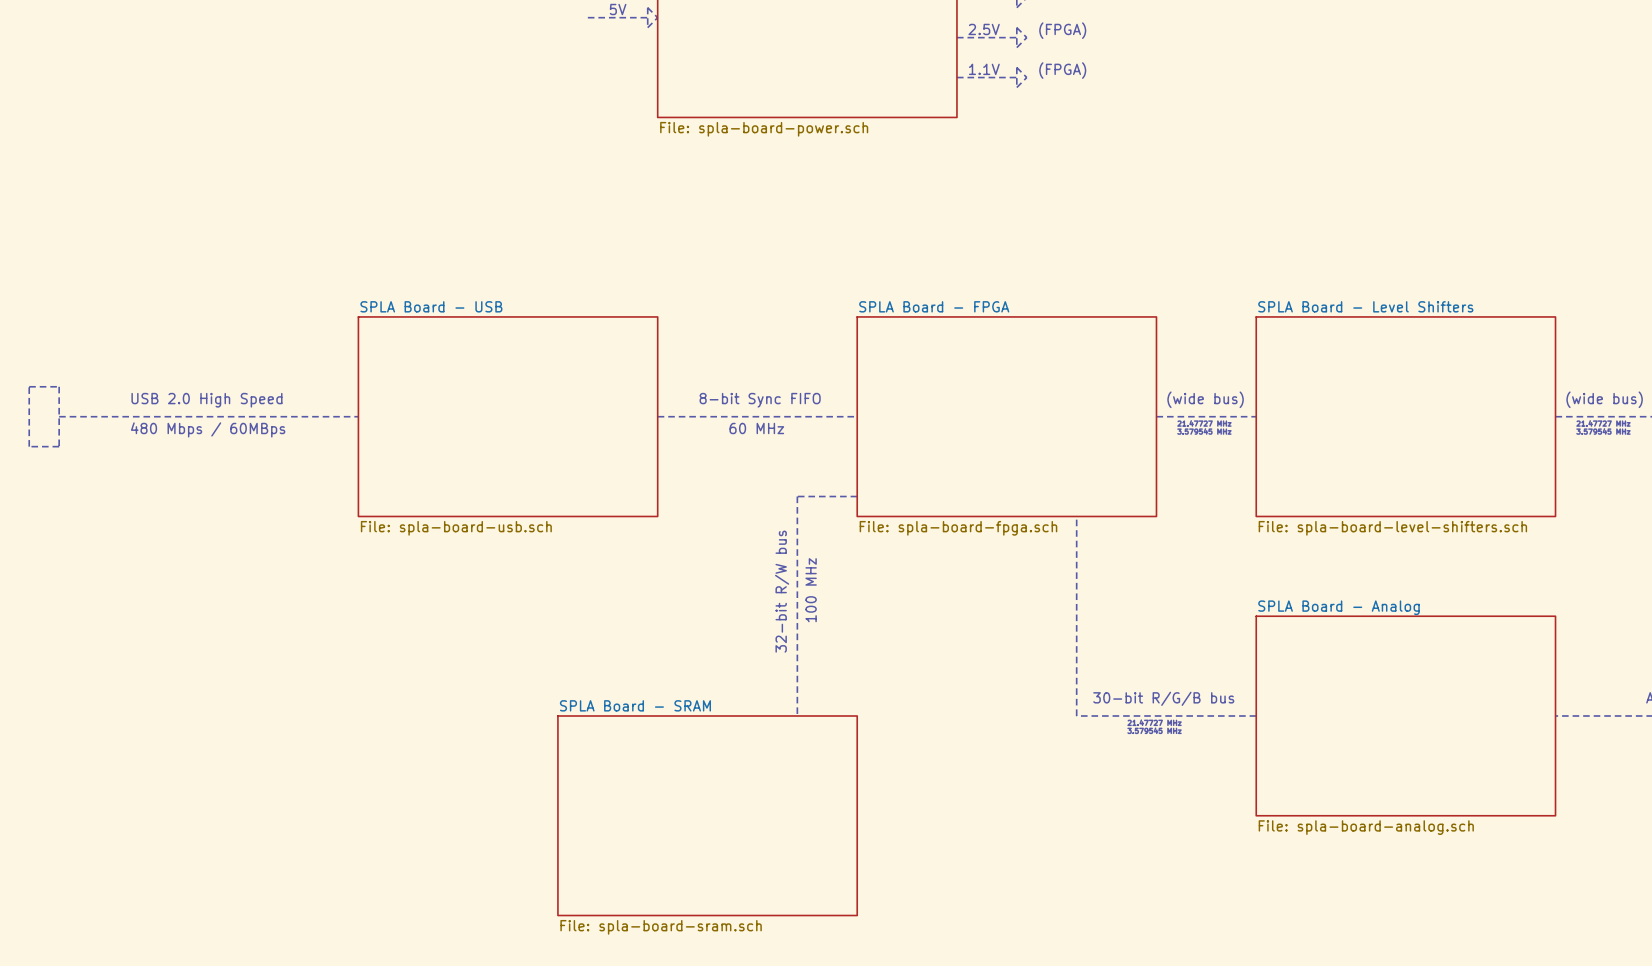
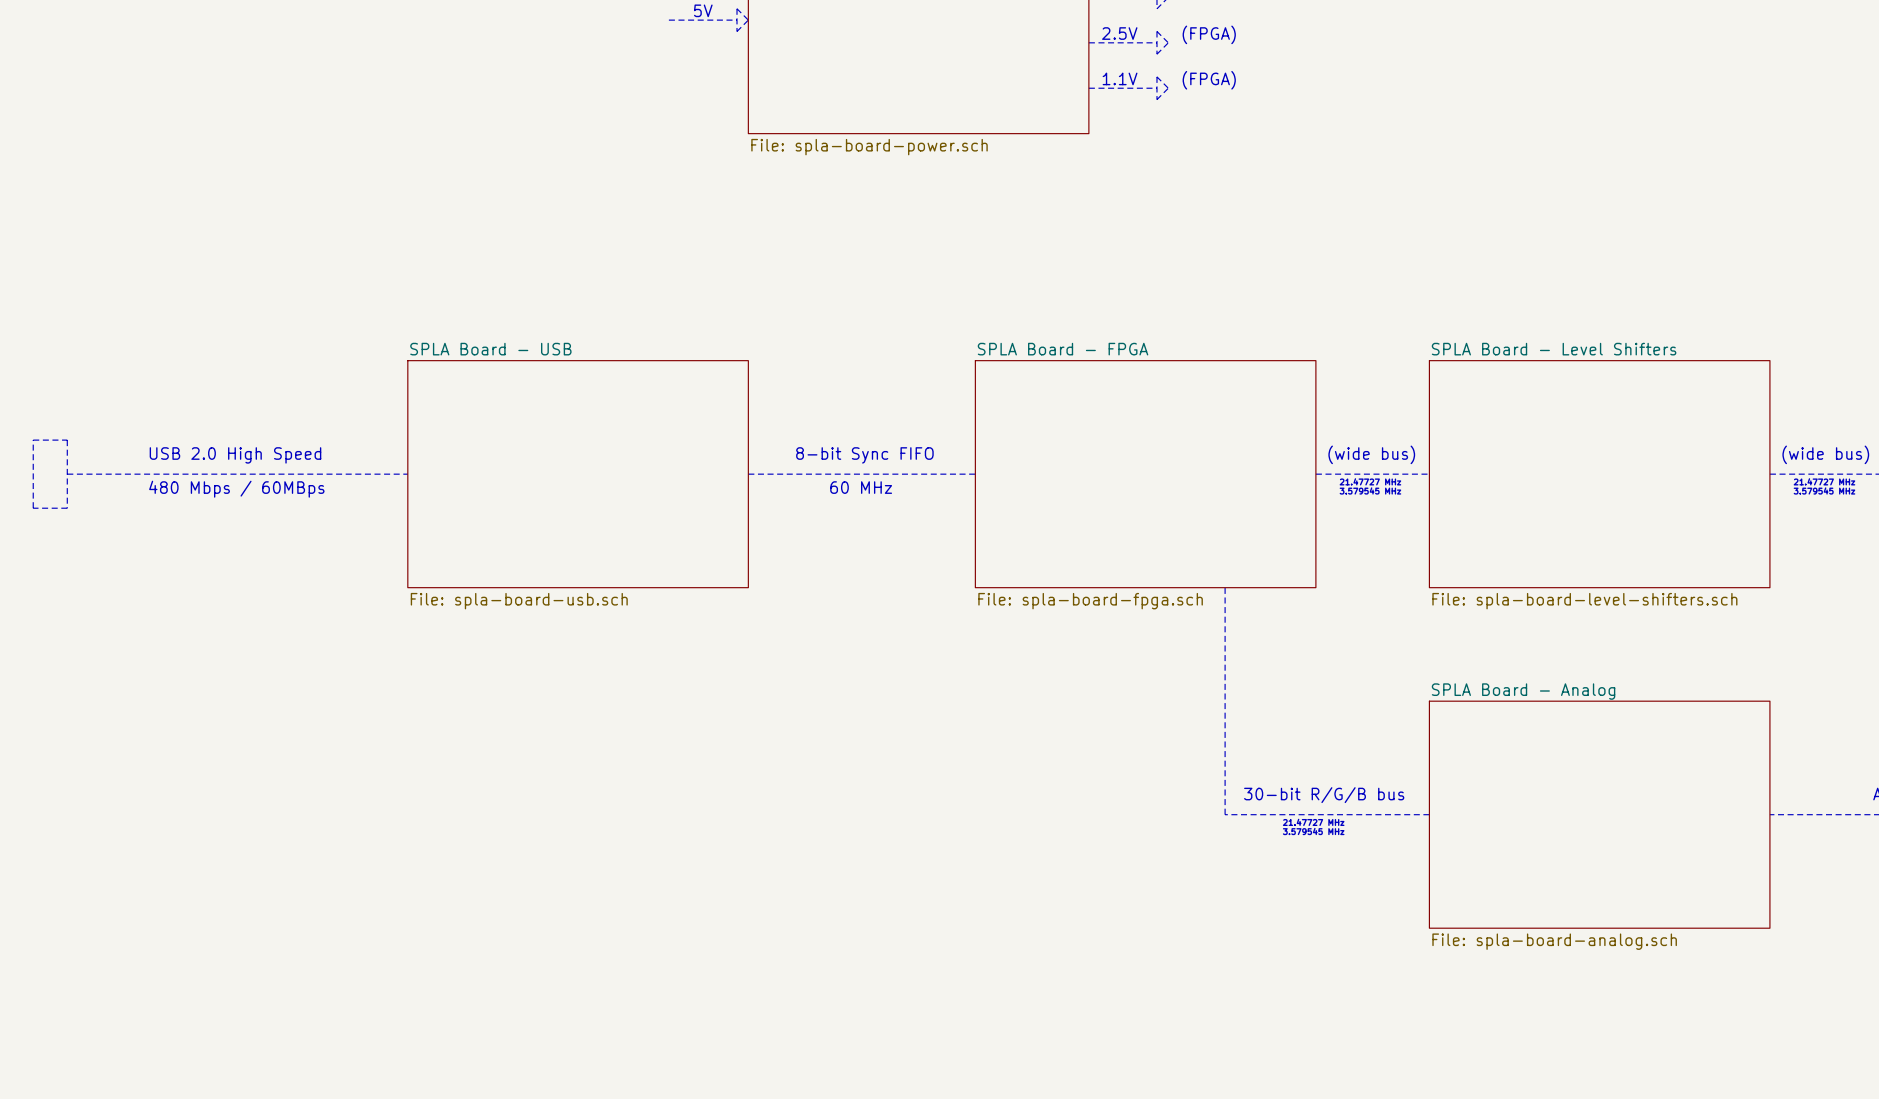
line: (857, 496) (797, 496) (797, 715) -> none
text: 100 MHz (811, 590) -> none
text: 32-bit R/W bus (782, 591) -> none
sheet SPLA Board - SRAM: File: spla-board-sram.sch (707, 815) -> none

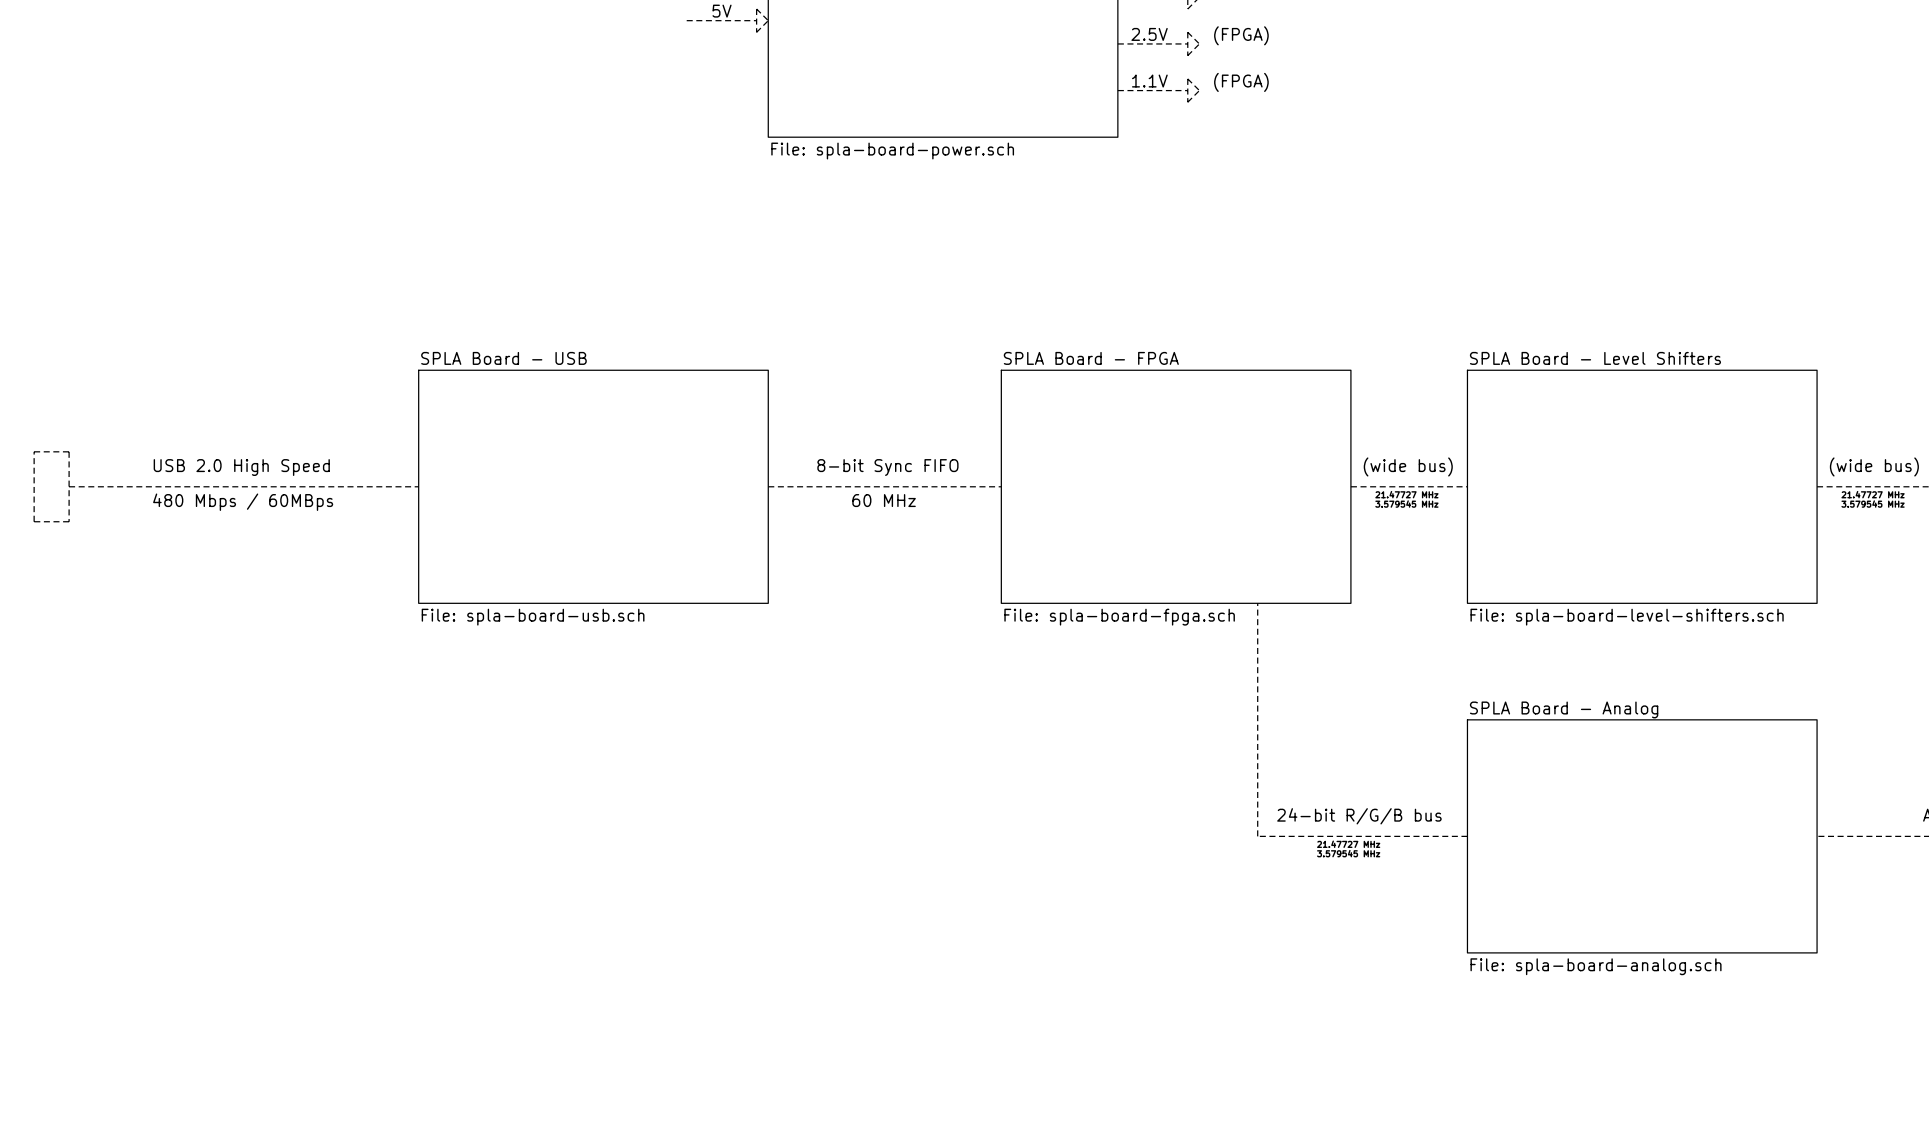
text: 30-bit R/G/B bus (1324, 795) -> 24-bit R/G/B bus (1359, 816)

